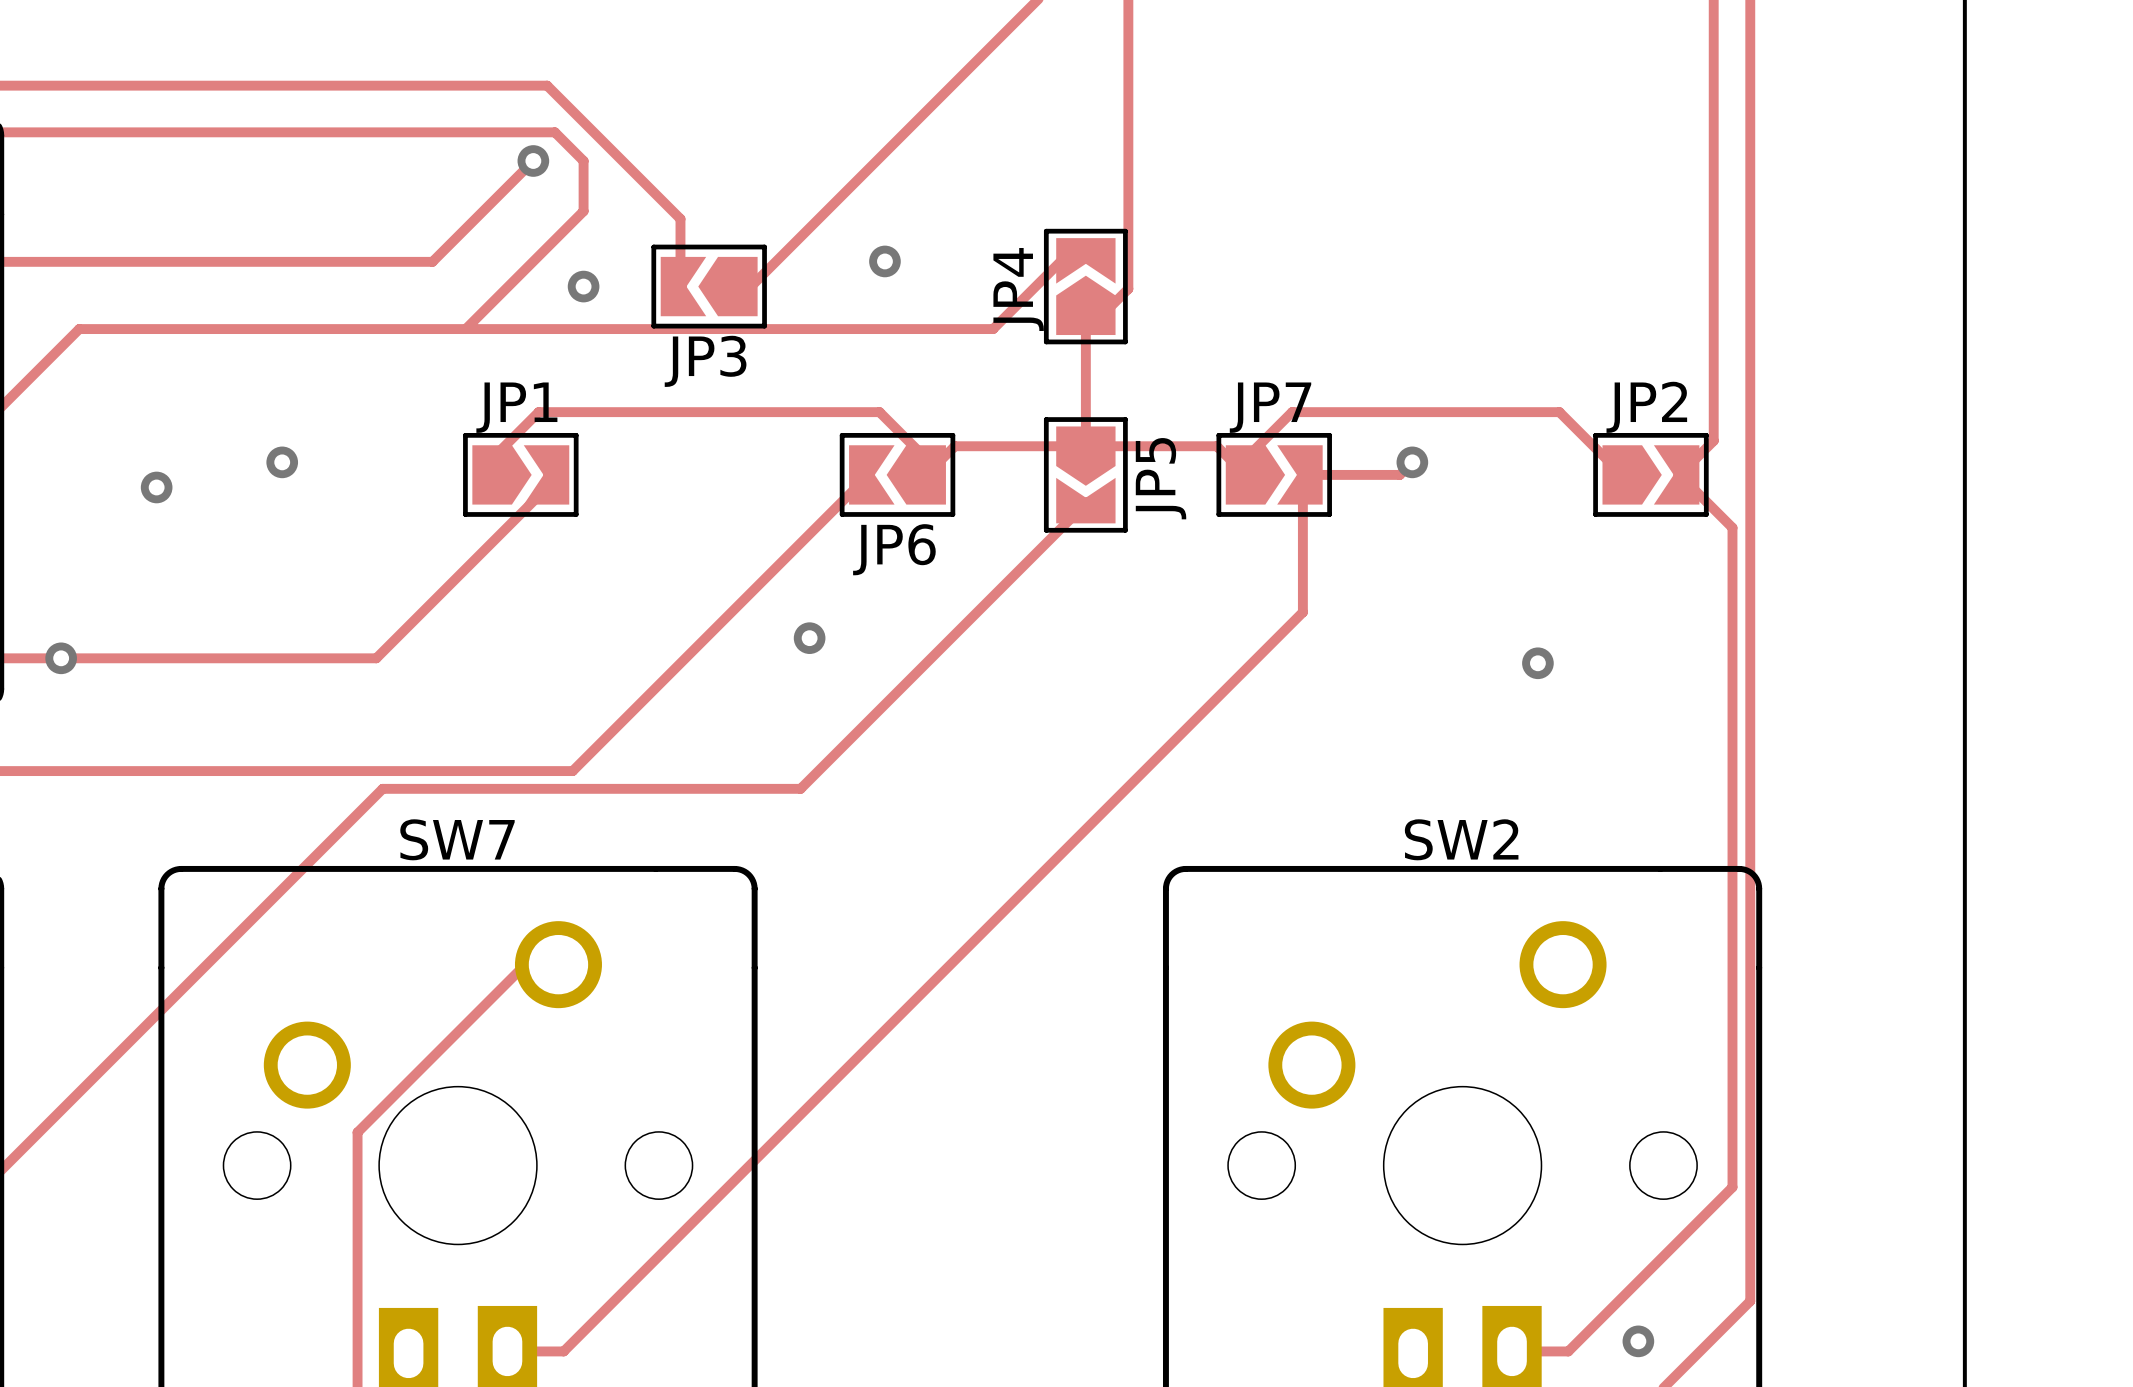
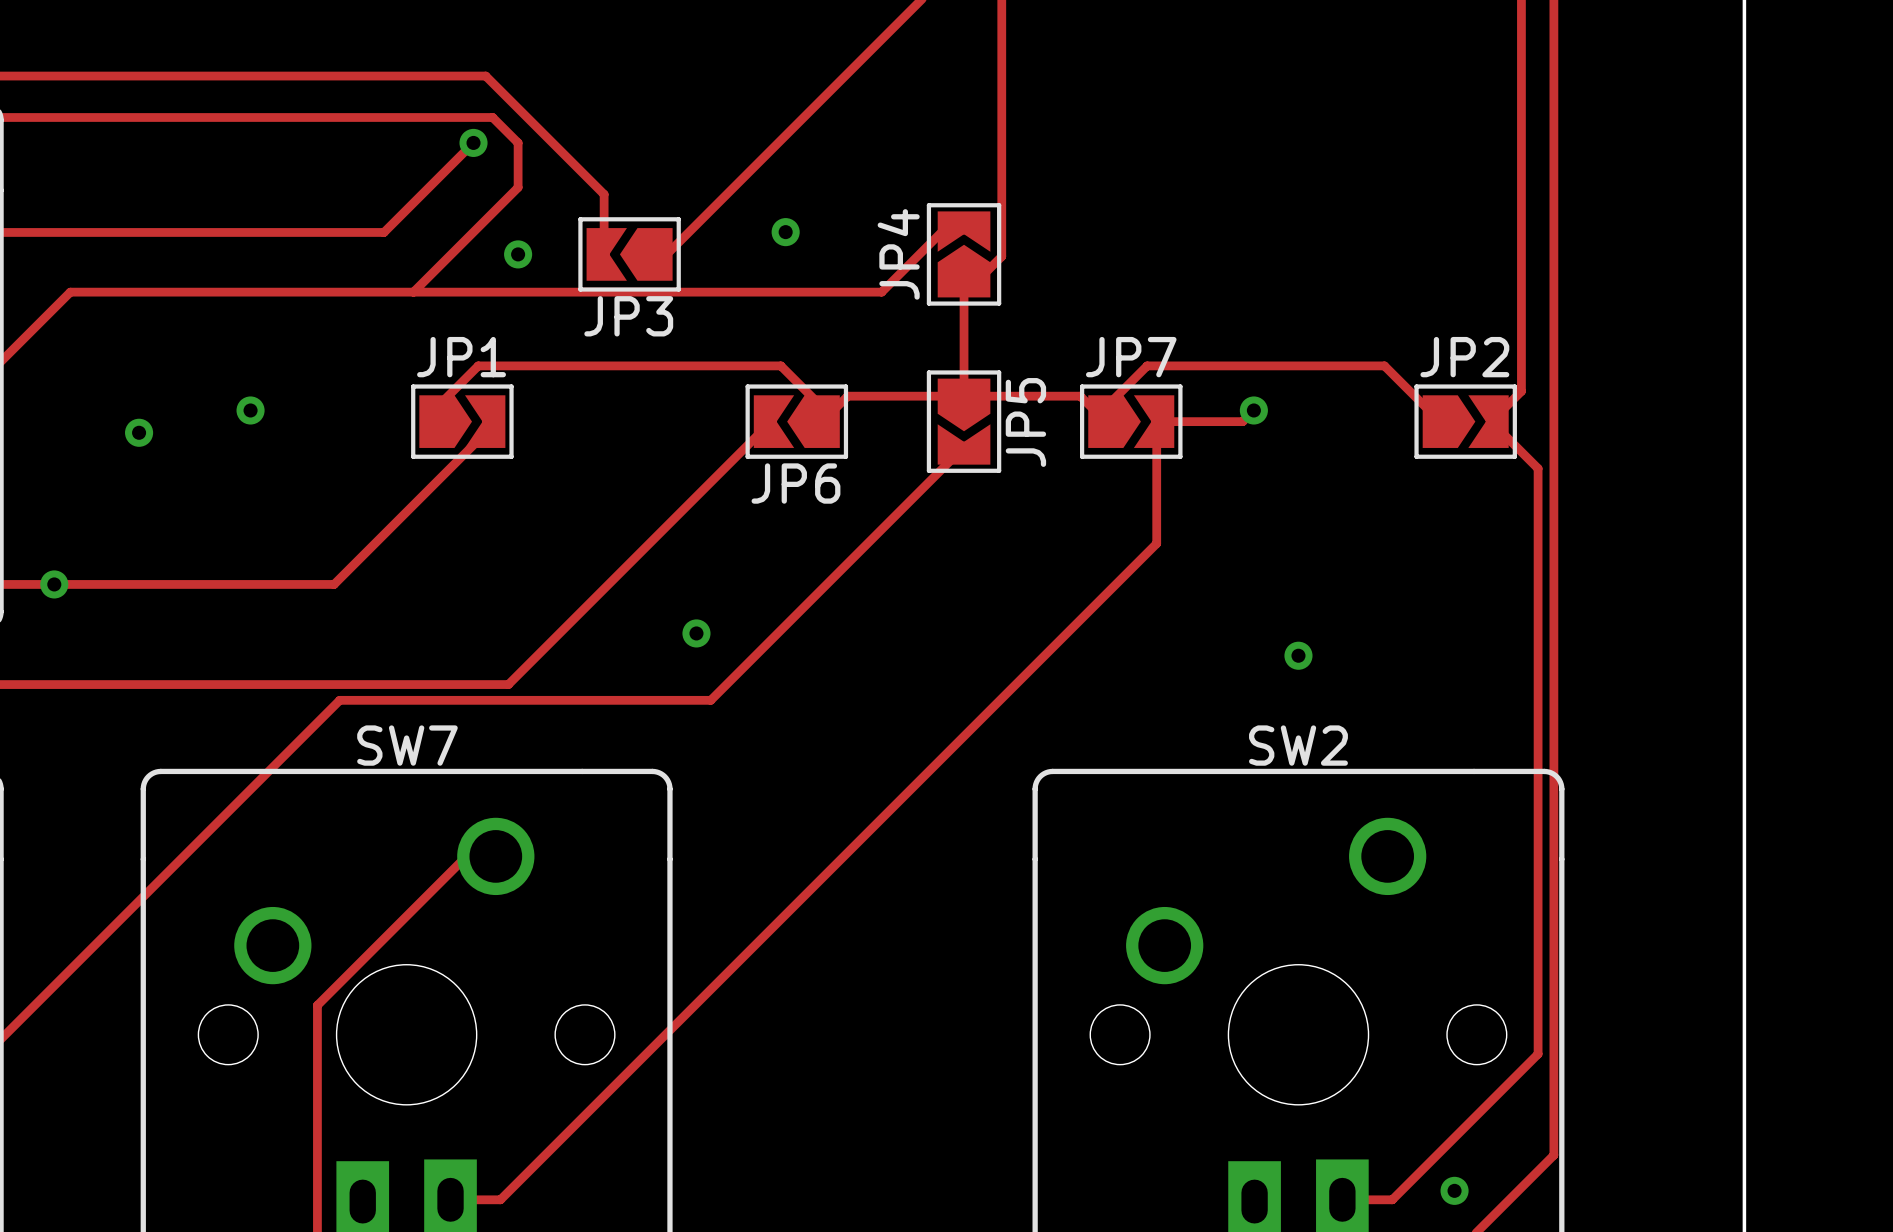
via position: (809, 638) -> (696, 633)
via position: (1537, 663) -> (1298, 655)

